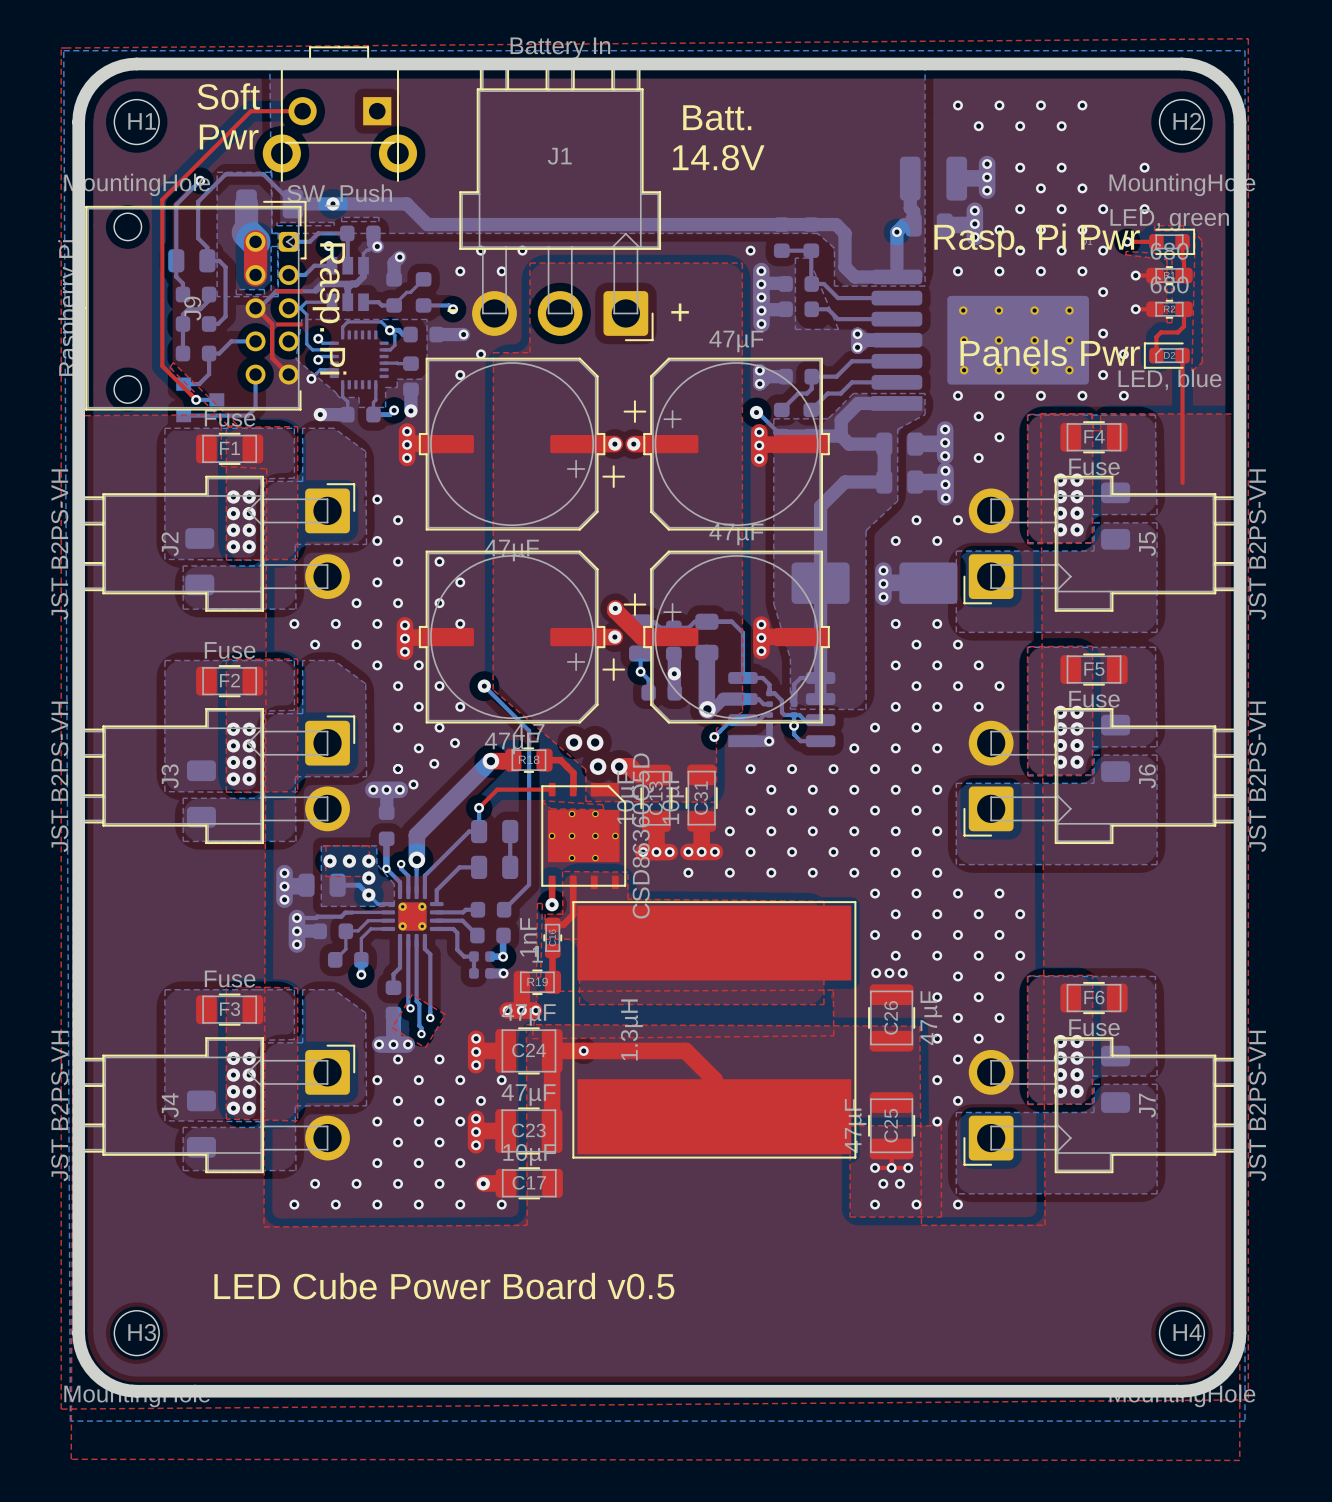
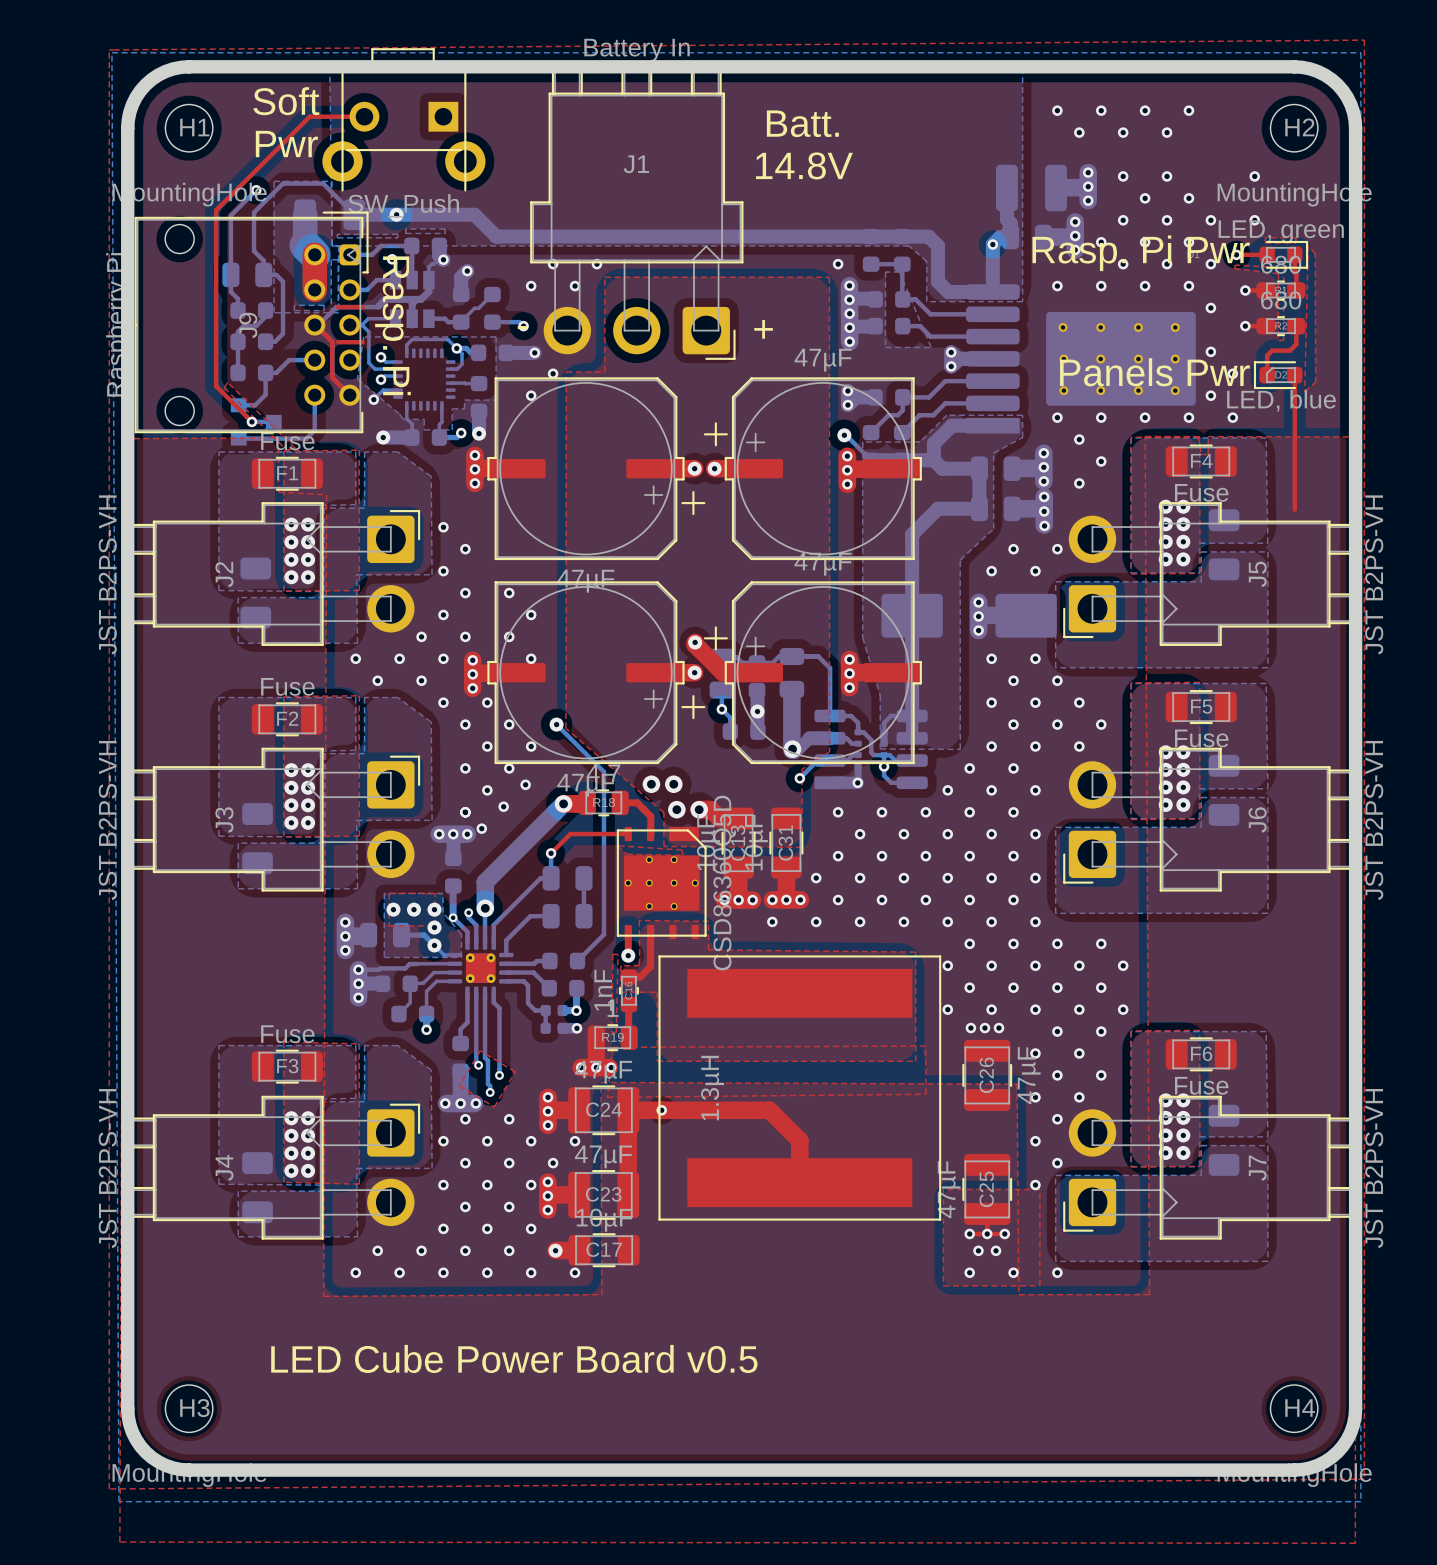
part footprint: [572, 901, 857, 1159] -> [658, 955, 942, 1221]
via: none -> (947, 965)
via: none -> (947, 1009)

